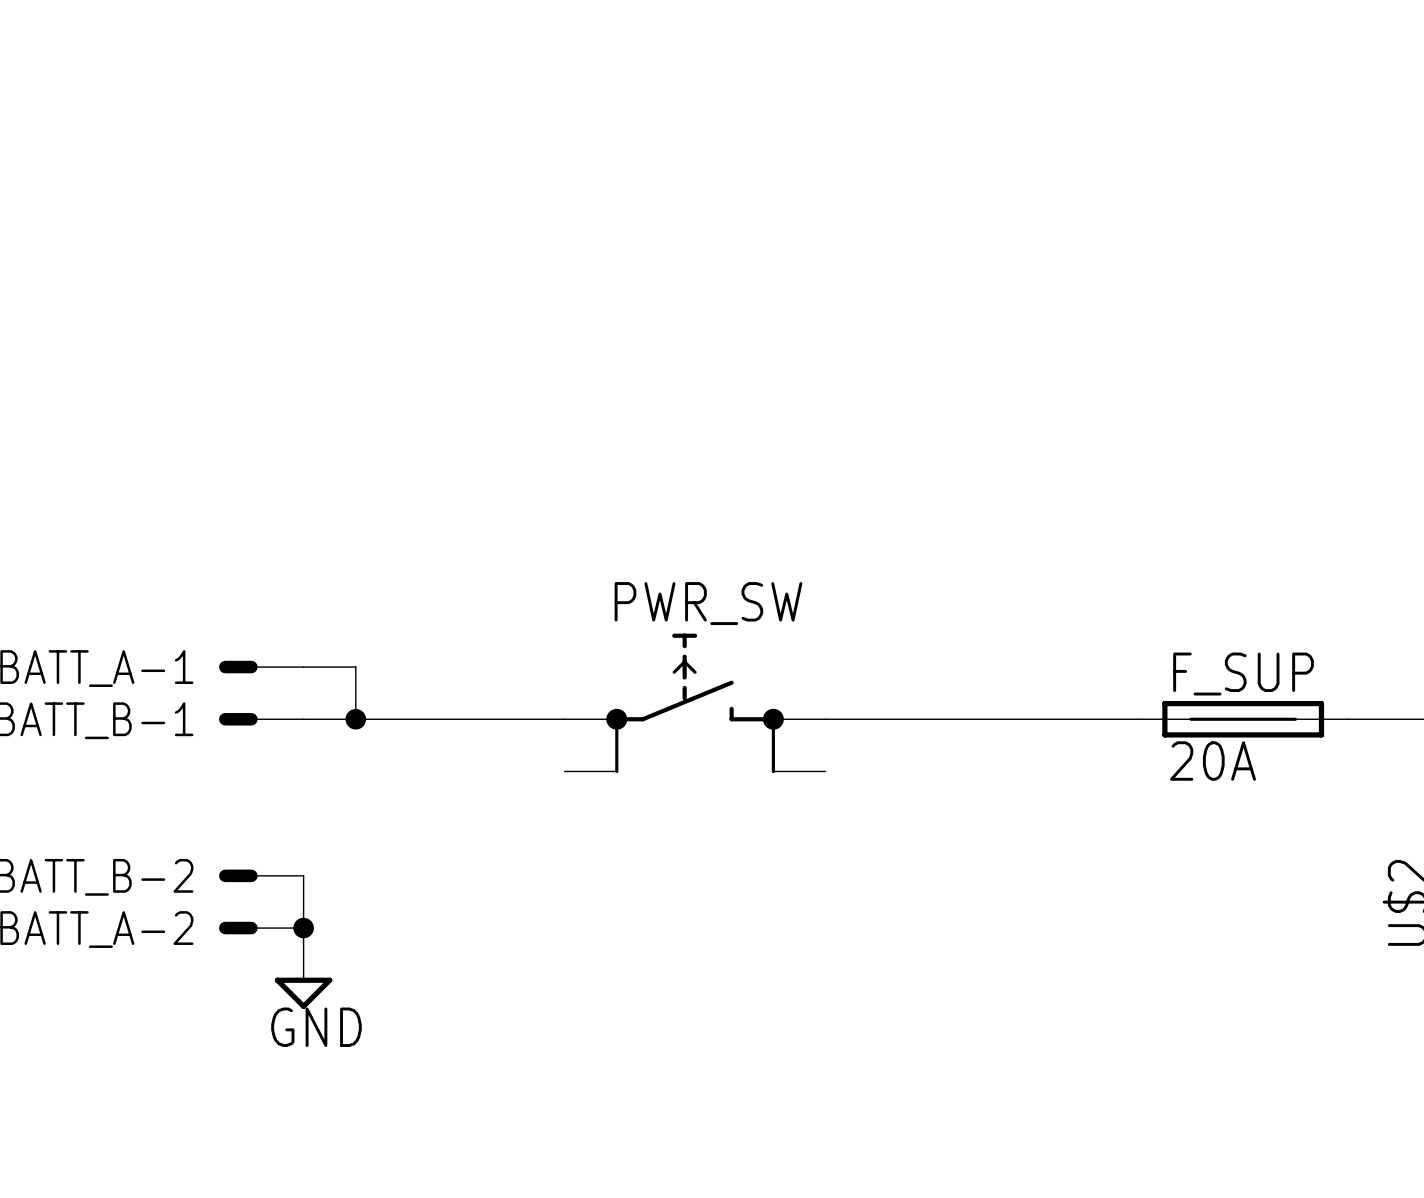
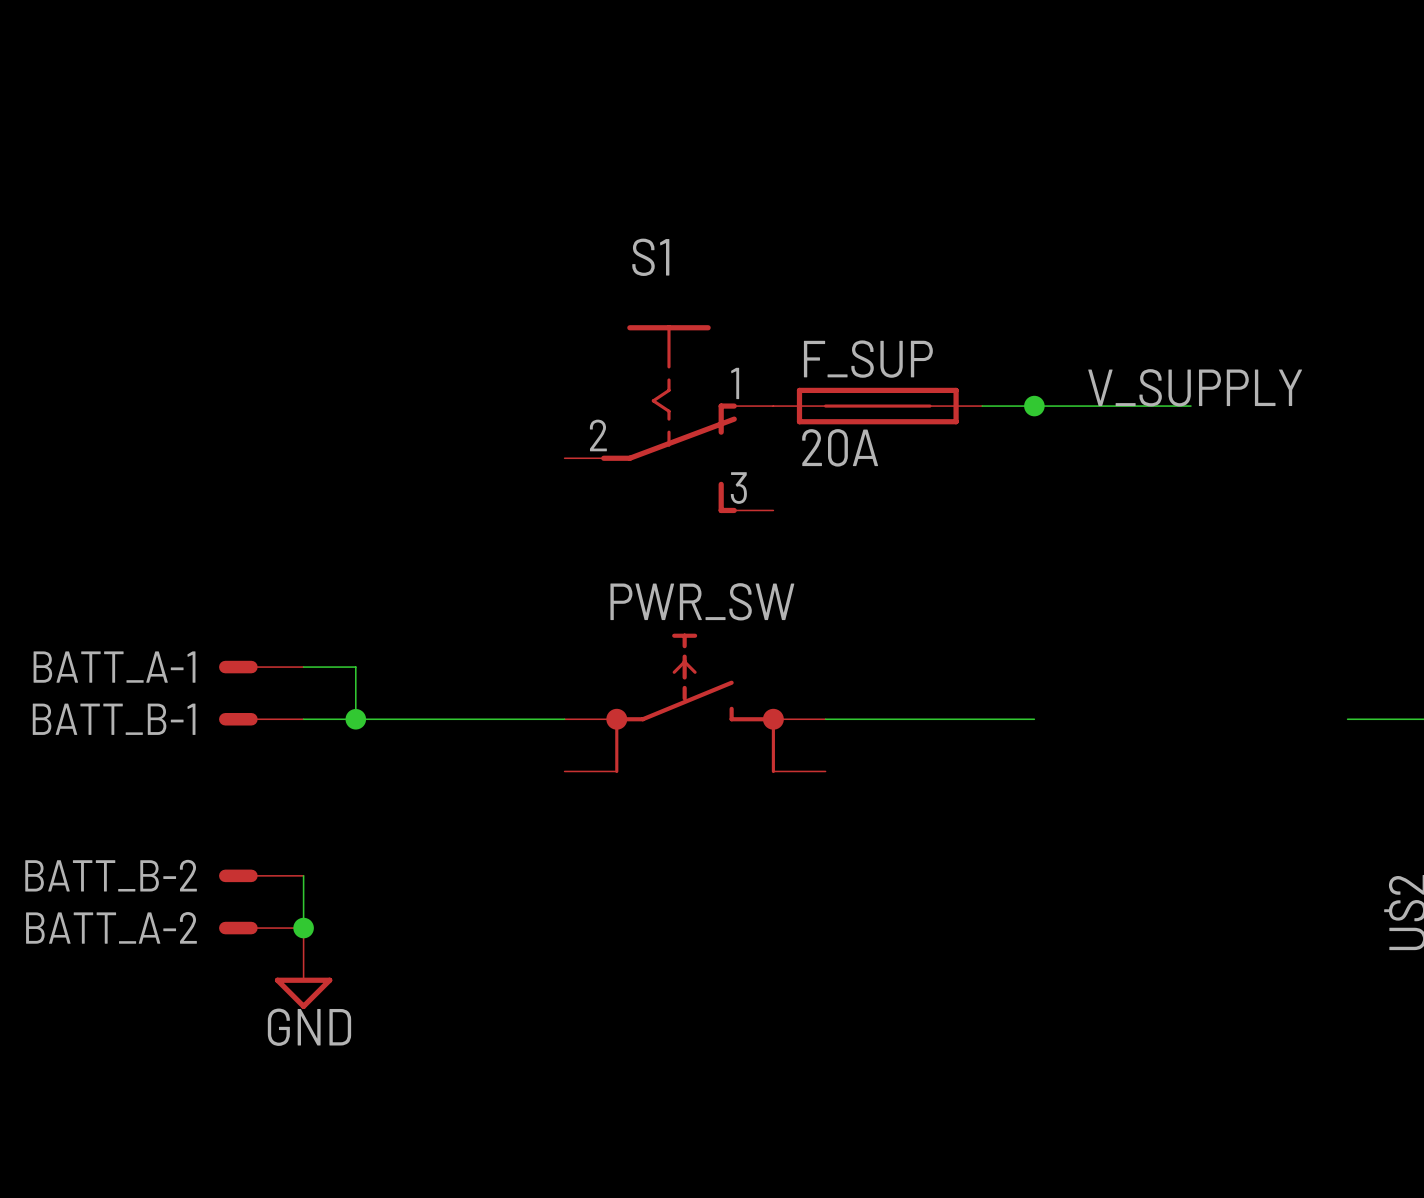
label: none -> V_SUPPLY (1195, 387)
wire: none -> (982, 406) (1190, 406)
junction: none -> (1034, 406)
S1: none -> (668, 419)
wire: (1034, 719) (1138, 719) -> none
F_SUP position: (1243, 719) -> (877, 406)

